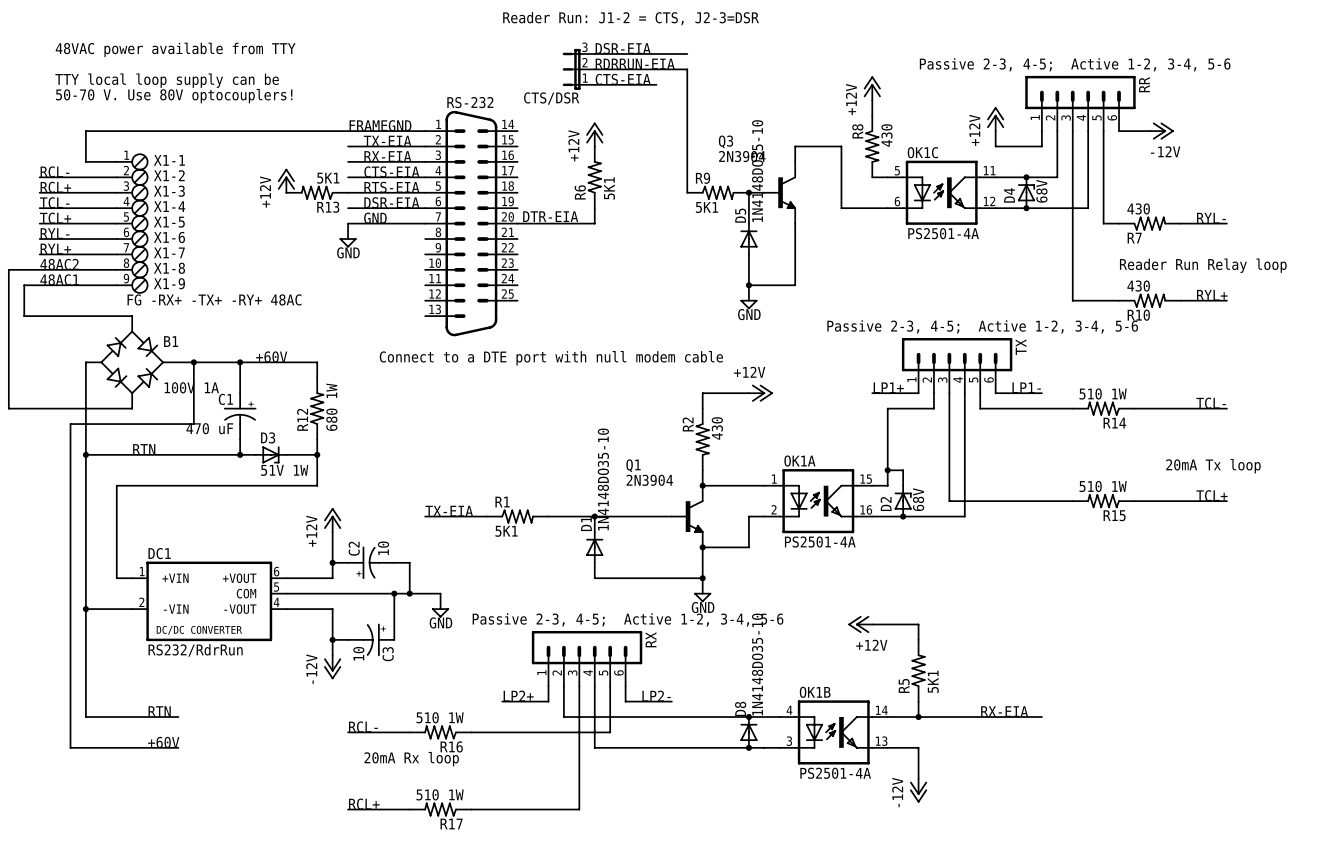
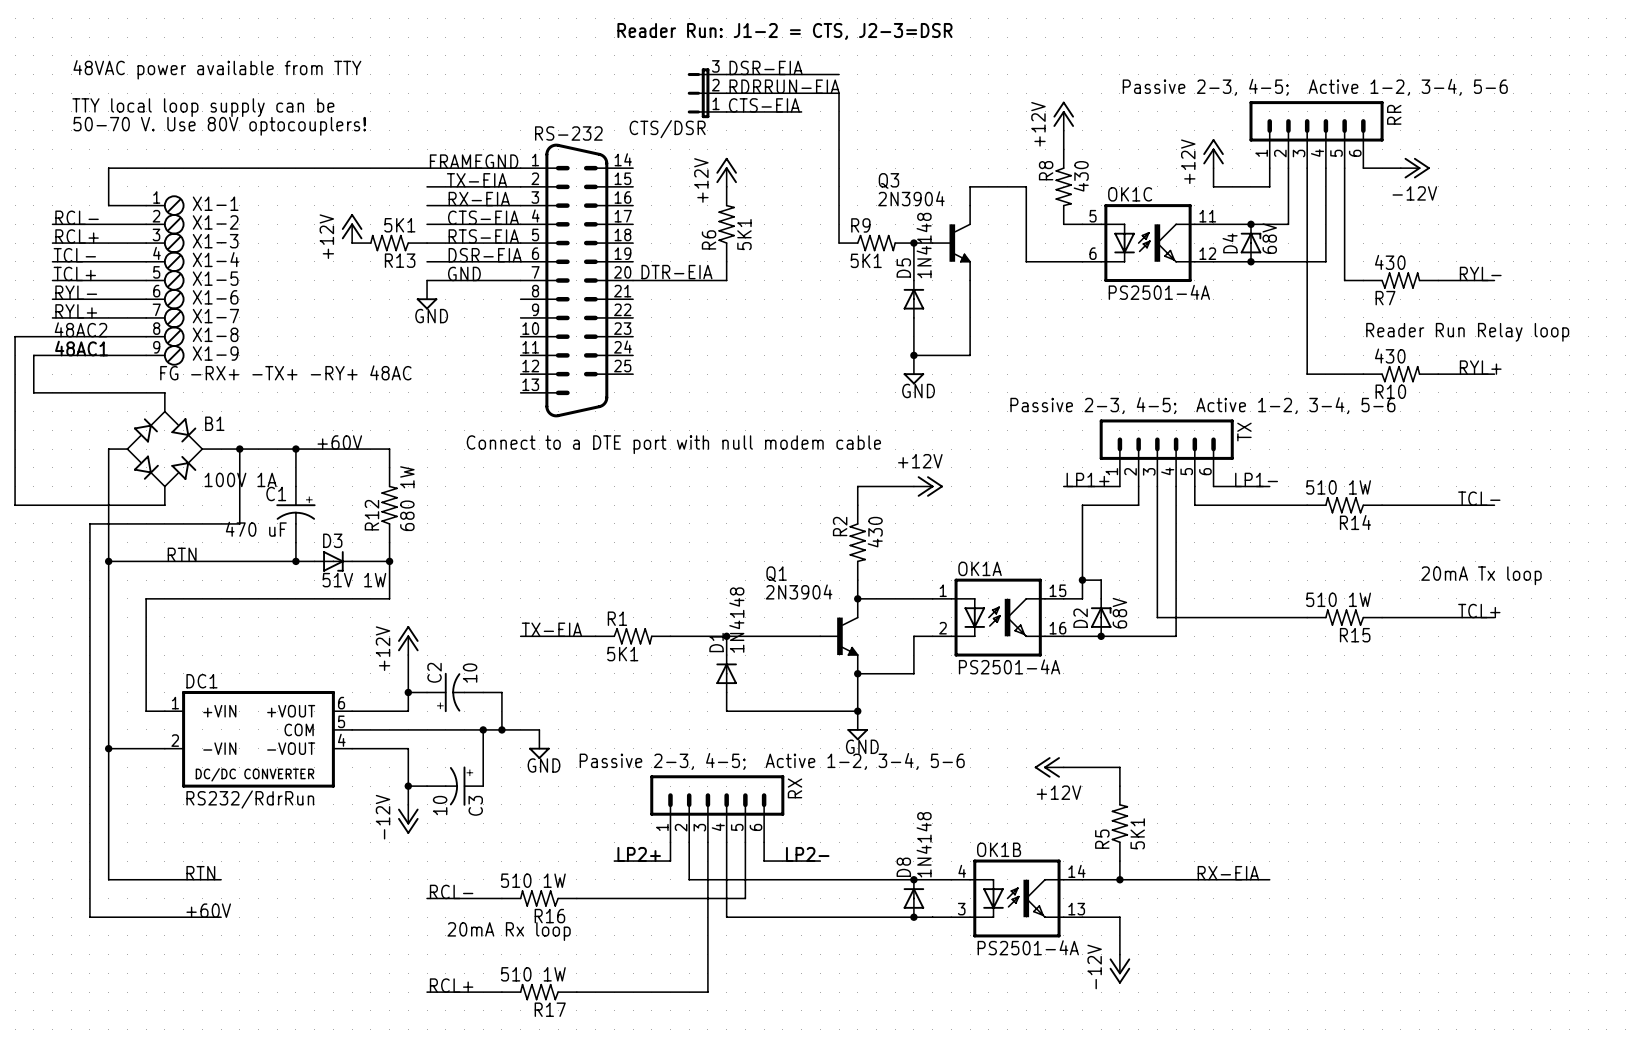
D5 value: 1N4148DO35-10 (757, 171) -> 1N4148 (924, 245)
D1 value: 1N4148DO35-10 (603, 479) -> 1N4148 (736, 620)
D8 value: 1N4148DO35-10 (757, 664) -> 1N4148 (924, 844)

